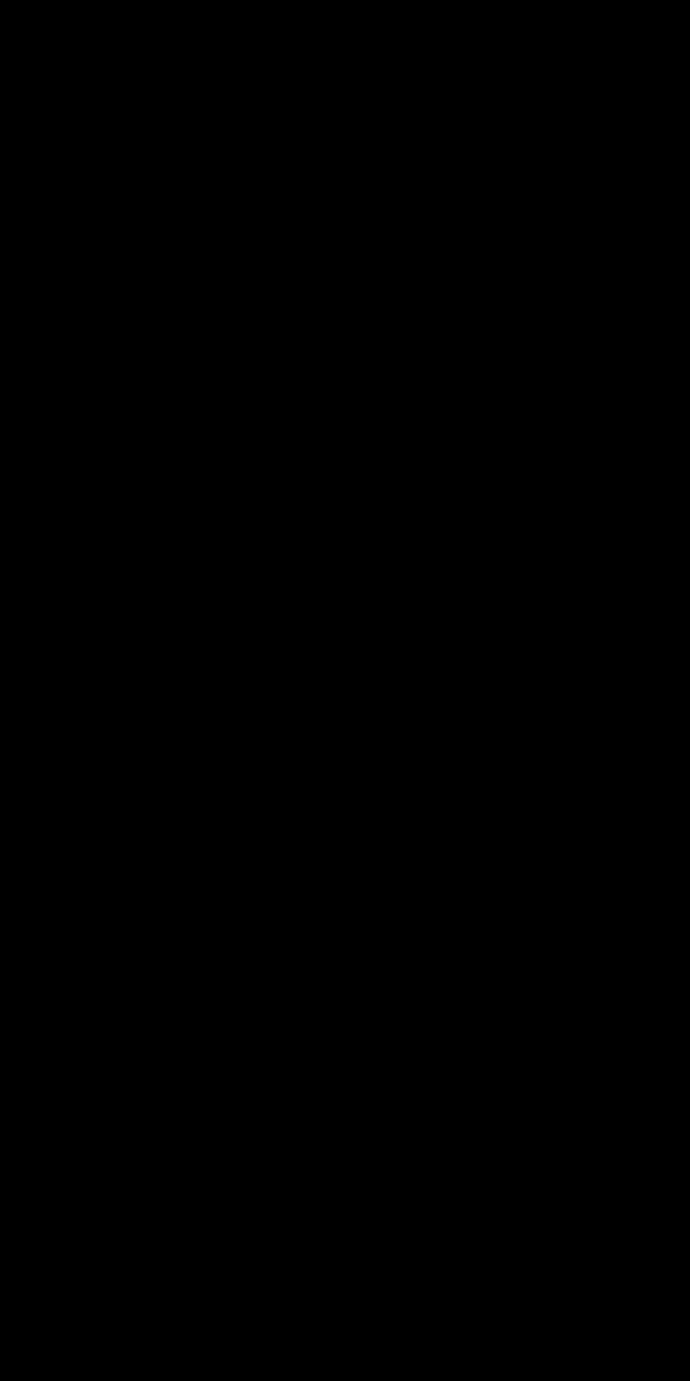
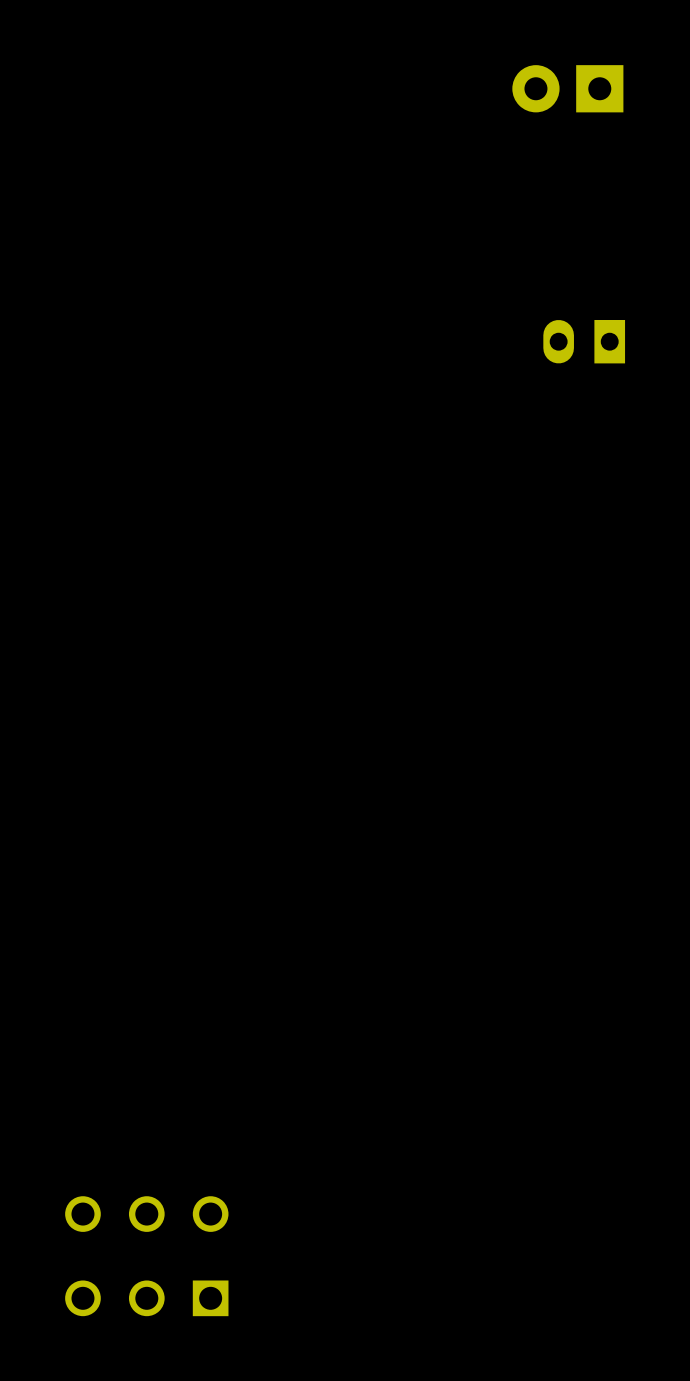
part: none -> (567, 88)
part: none -> (584, 341)
part: none -> (146, 1256)

